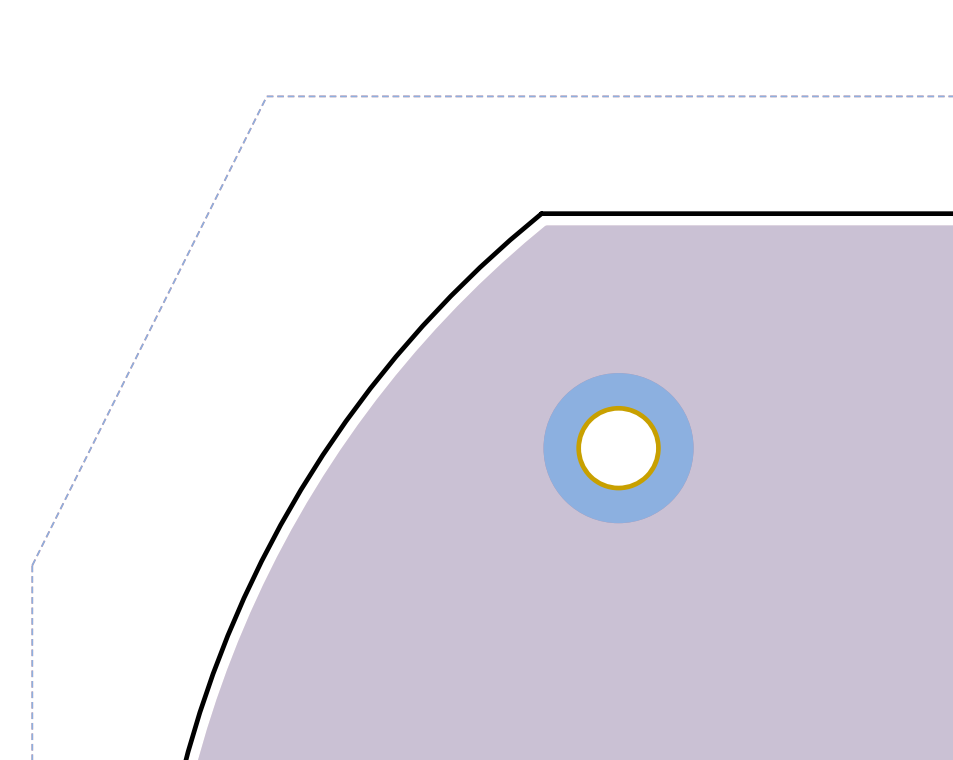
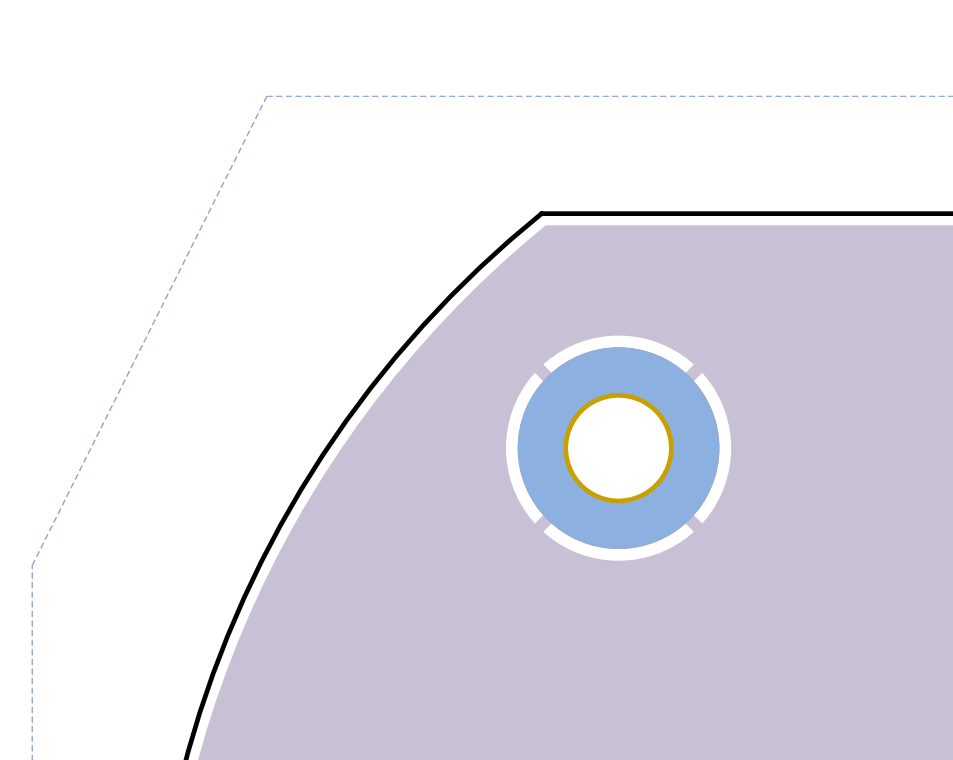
part footprint: [543, 373, 694, 524] -> [517, 347, 720, 549]

